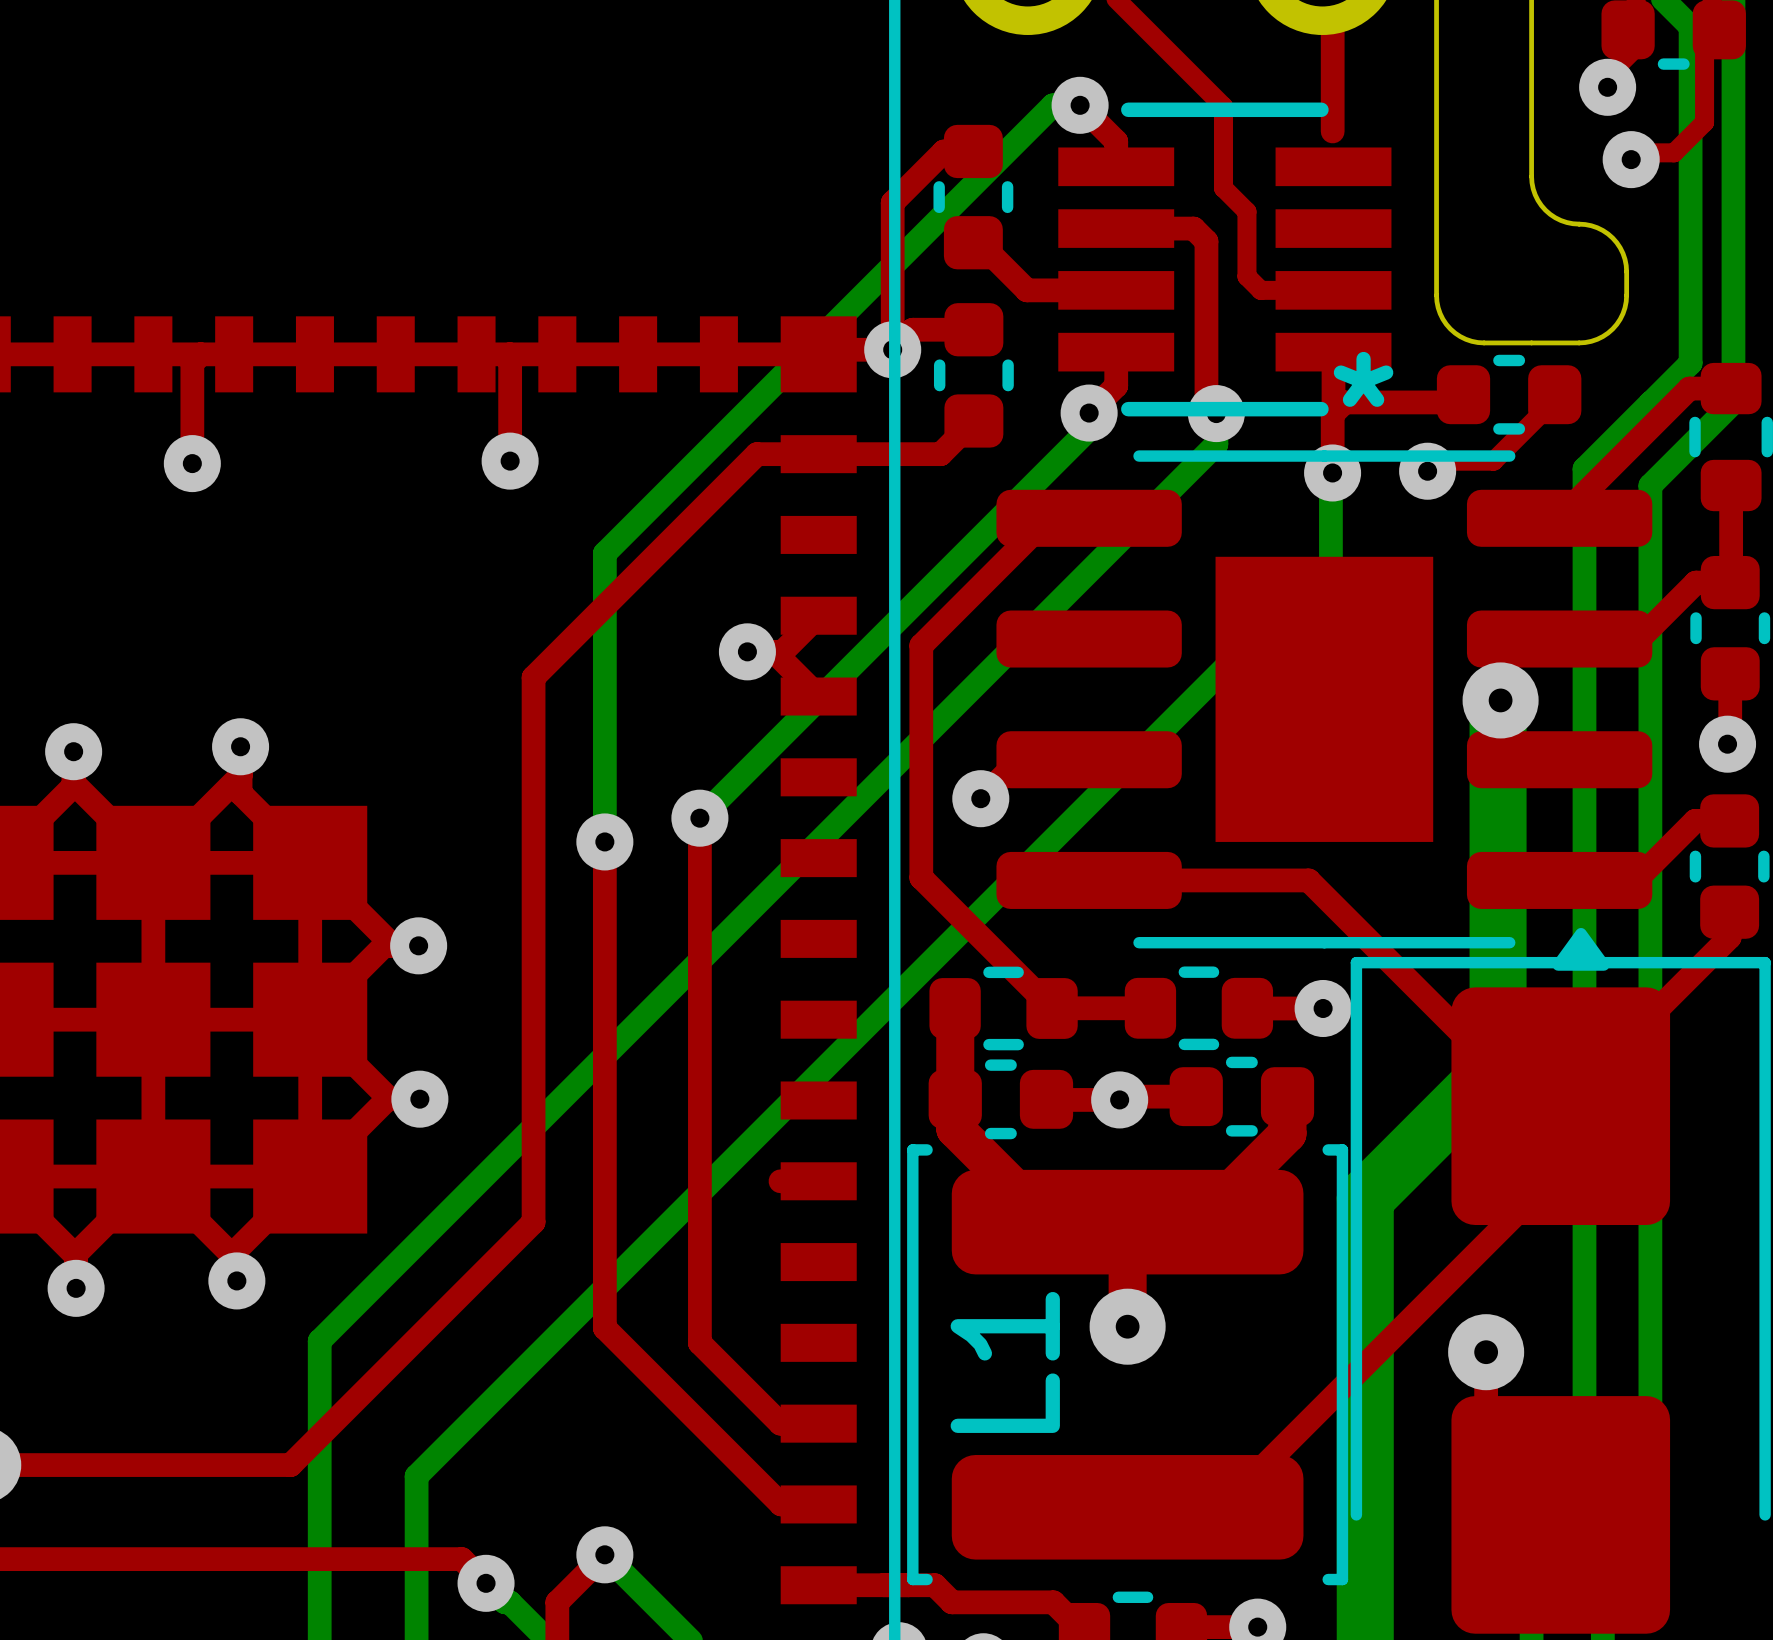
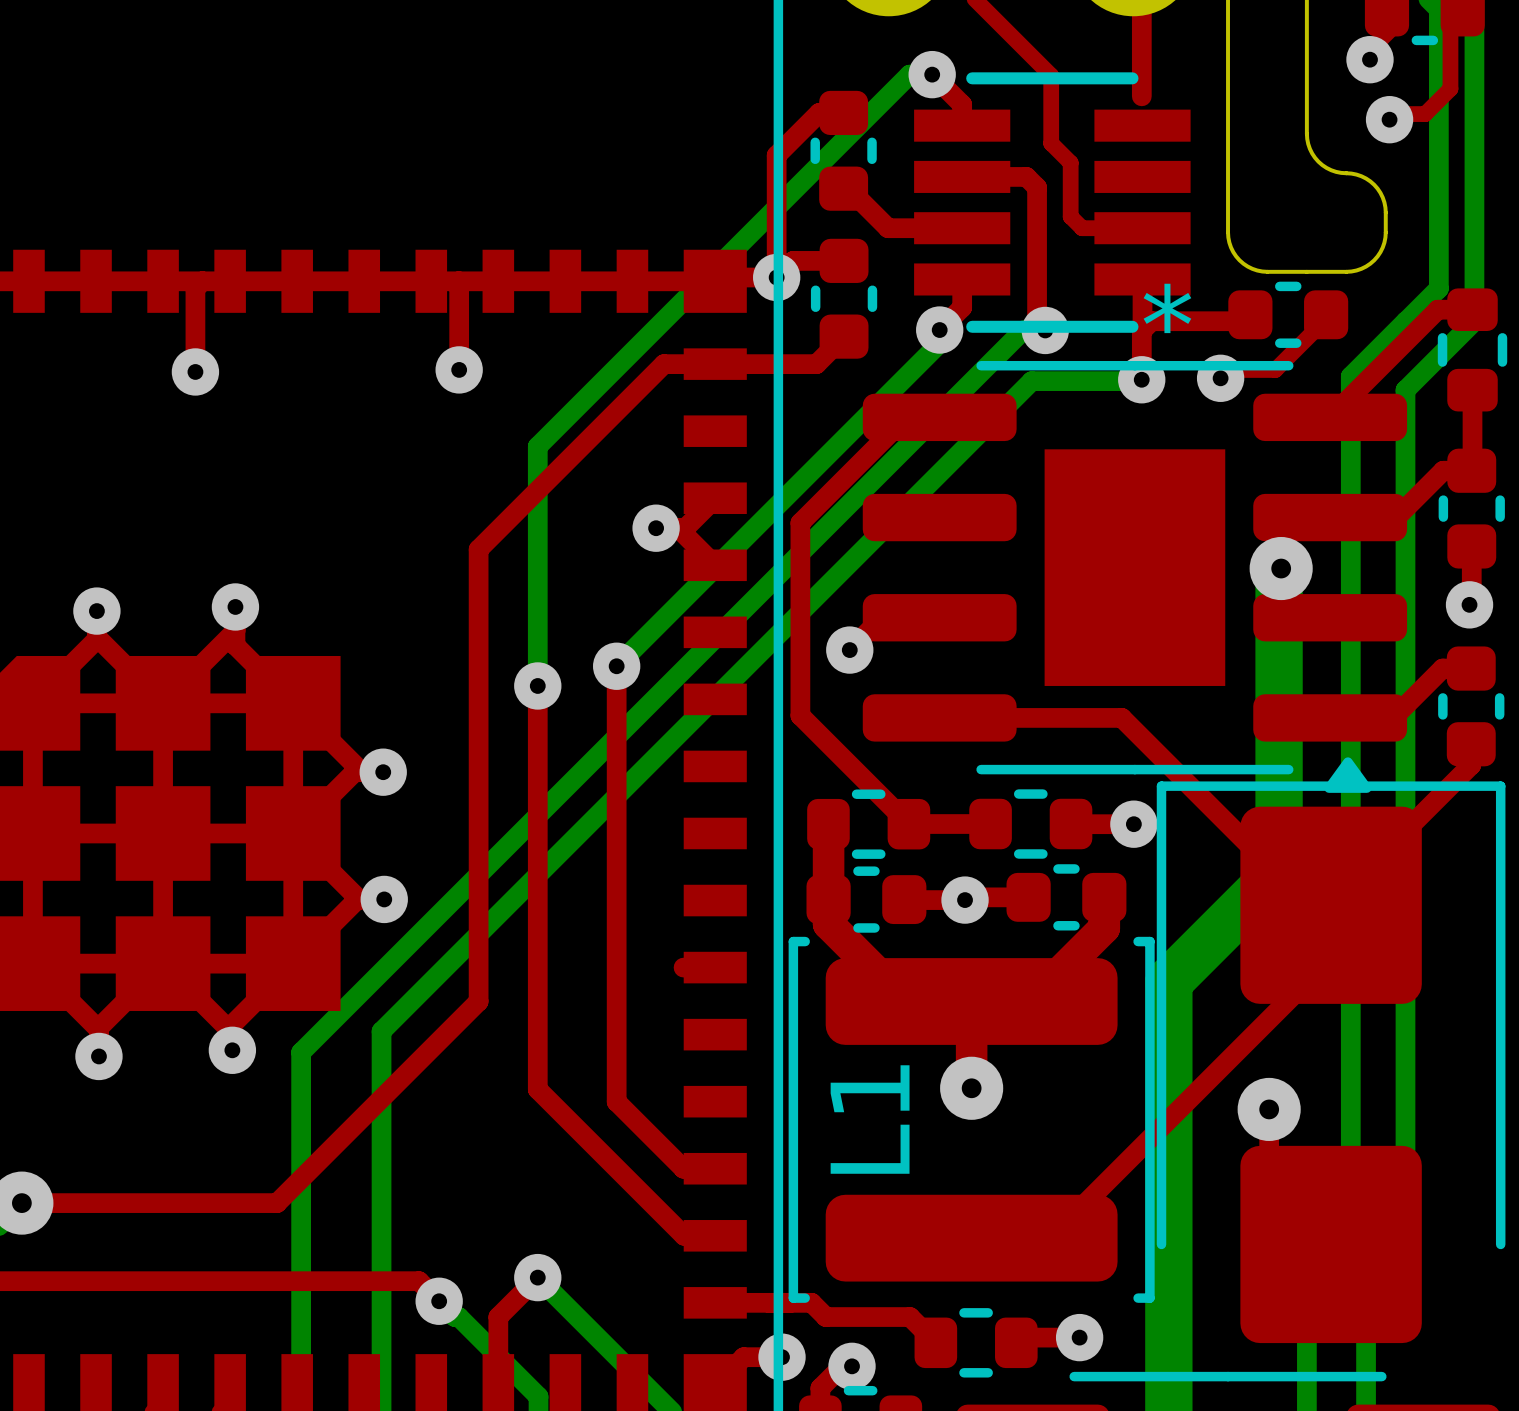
bottom track: (1216, 413) (1216, 444) (319, 1340) -> (1045, 330) (1023, 330) (301, 1052) (301, 1100)
bottom track: (1330, 474) (1330, 561) (416, 1476) -> (1140, 381) (1031, 381) (381, 1031) (381, 1212)

